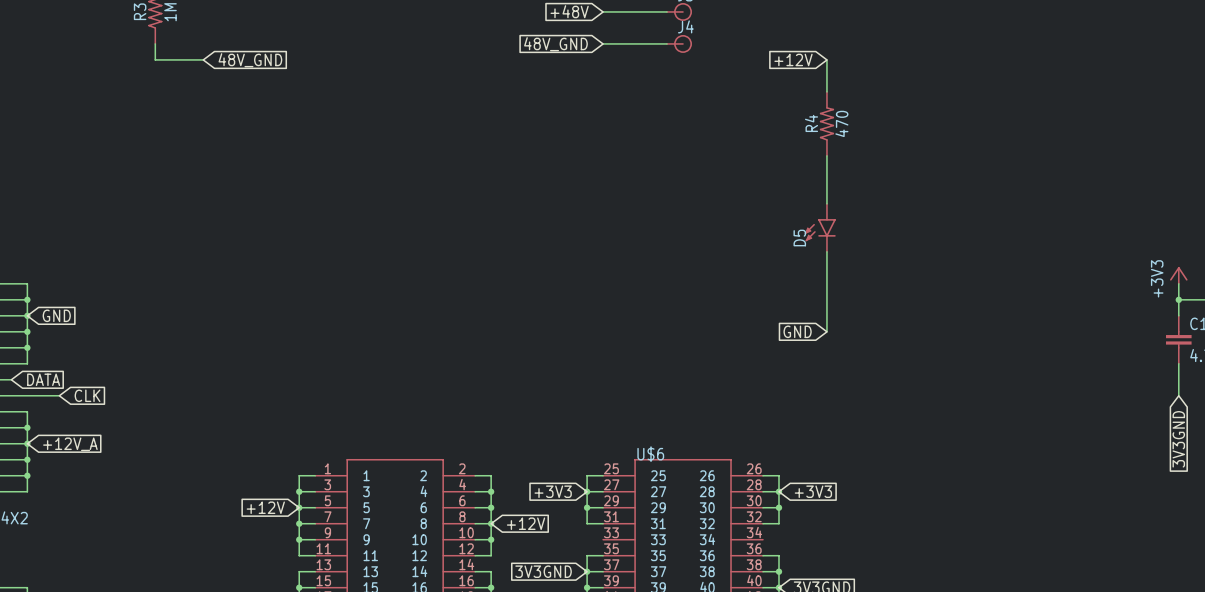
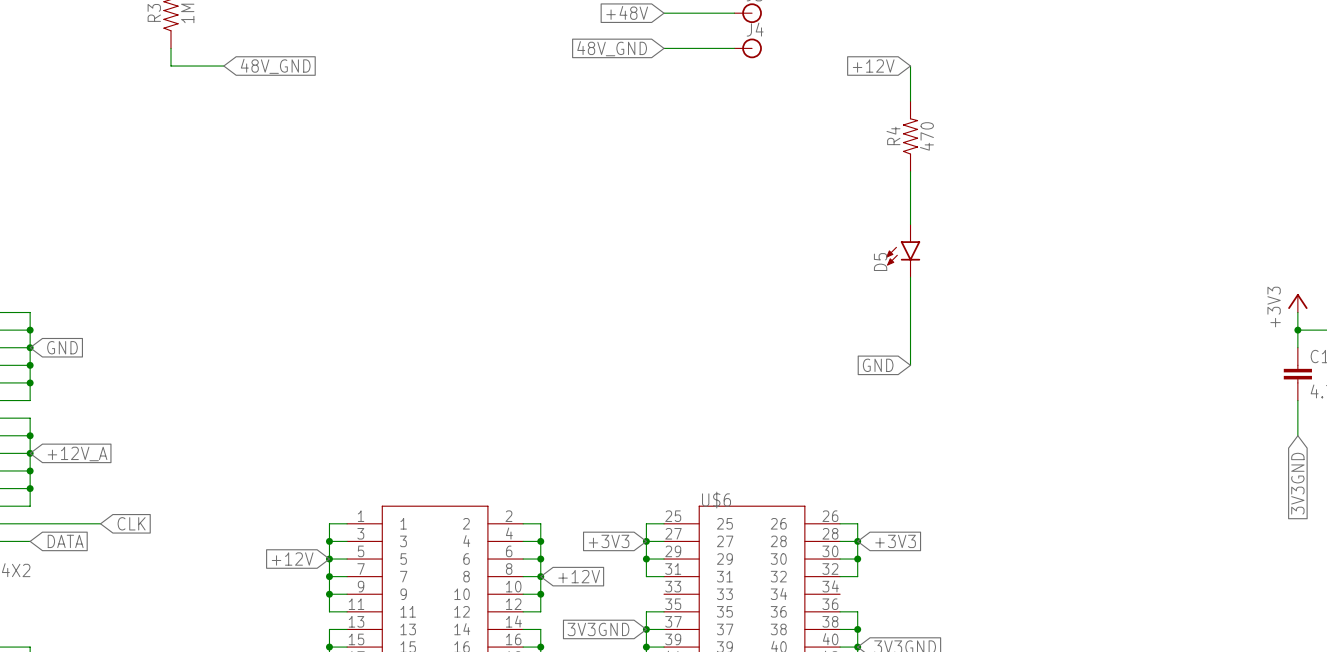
wire: none -> (12, 418) (30, 418) (30, 453)
global label position: DATA (43, 379) -> DATA (65, 541)
wire: (27, 395) (59, 395) -> none
junction: none -> (30, 435)
global label position: CLK (87, 395) -> CLK (131, 523)
junction: none -> (30, 453)
global label position: +12V_A (70, 444) -> +12V_A (77, 453)
wire: (27, 459) (27, 491) -> none
junction: (27, 459) -> none
wire: none -> (30, 523) (100, 523)
junction: (27, 475) -> none

